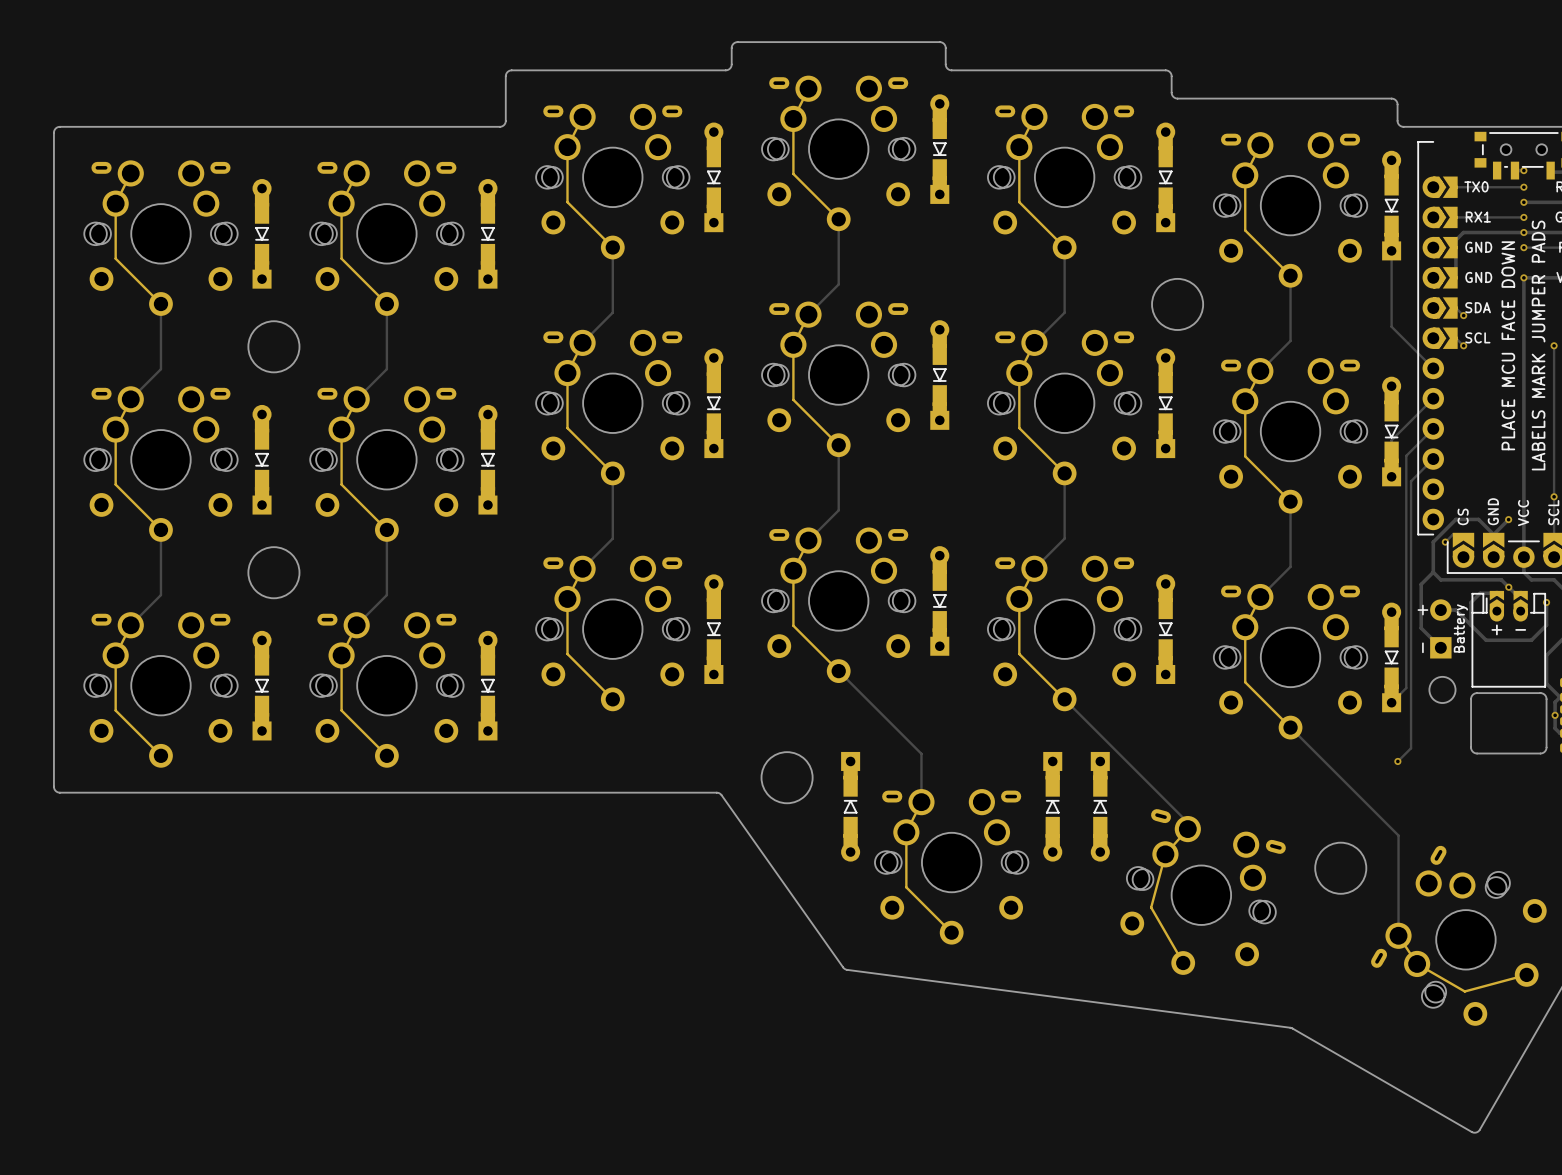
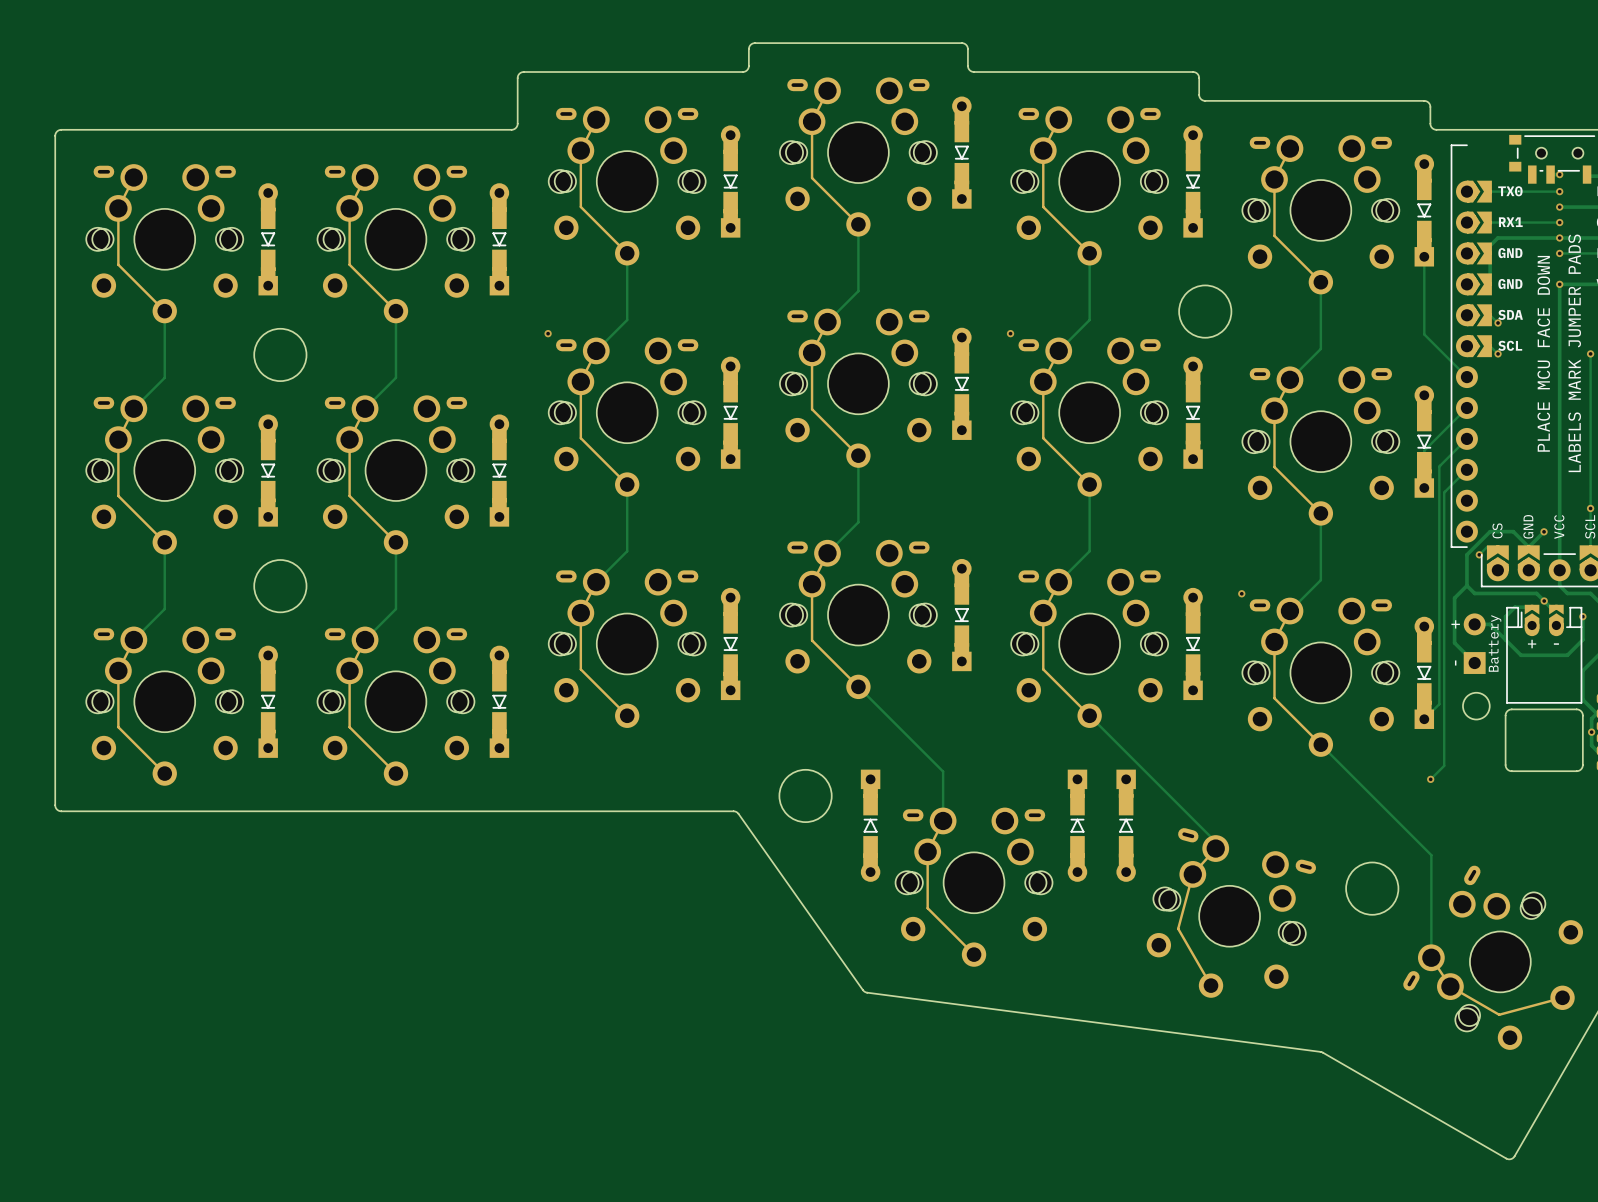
via: none -> (548, 333)
via: none -> (1010, 333)
via: none -> (1241, 593)

